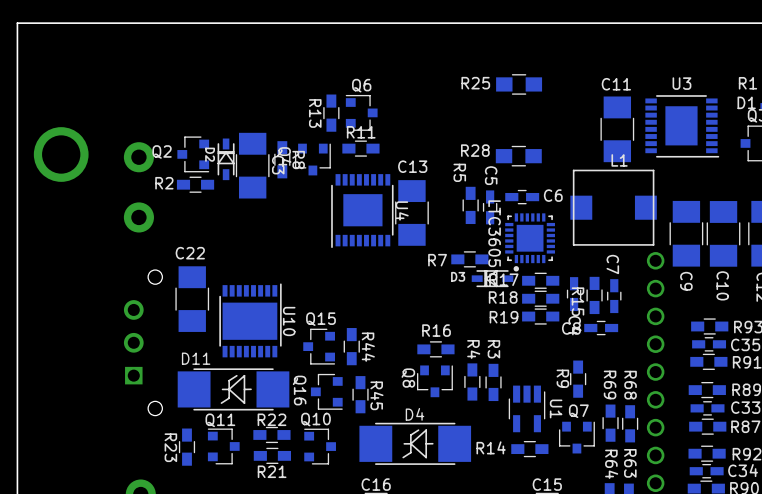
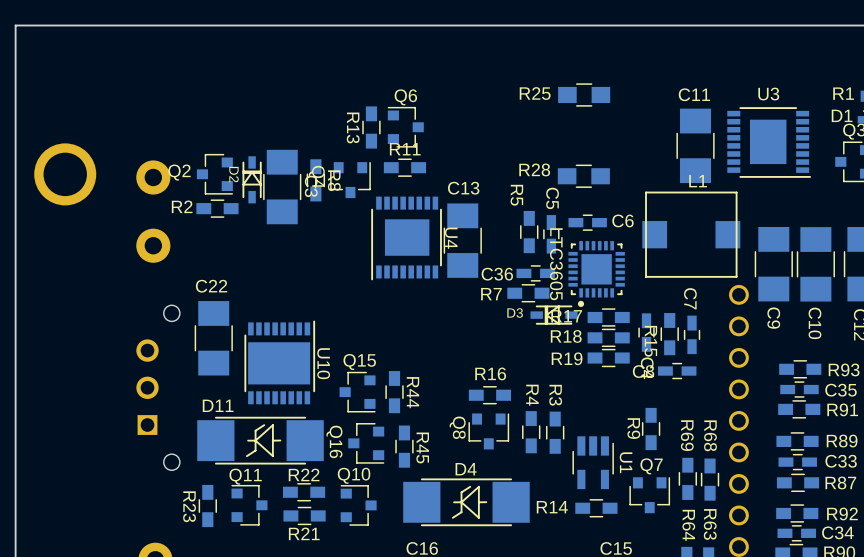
C36: none -> (535, 273)

